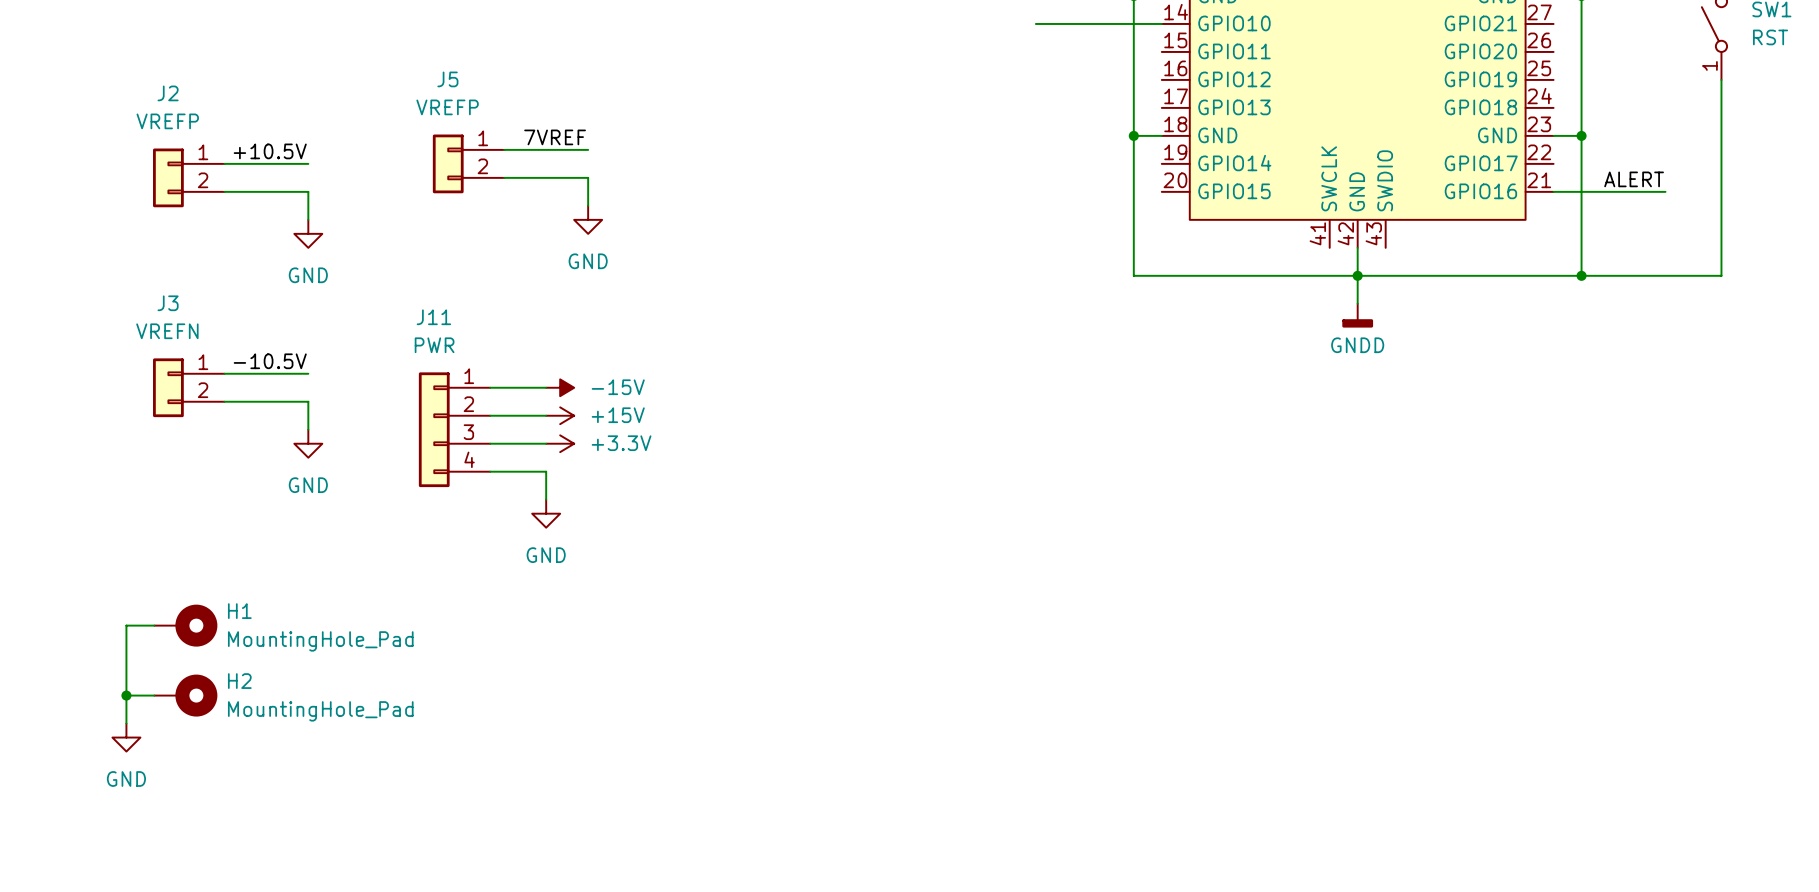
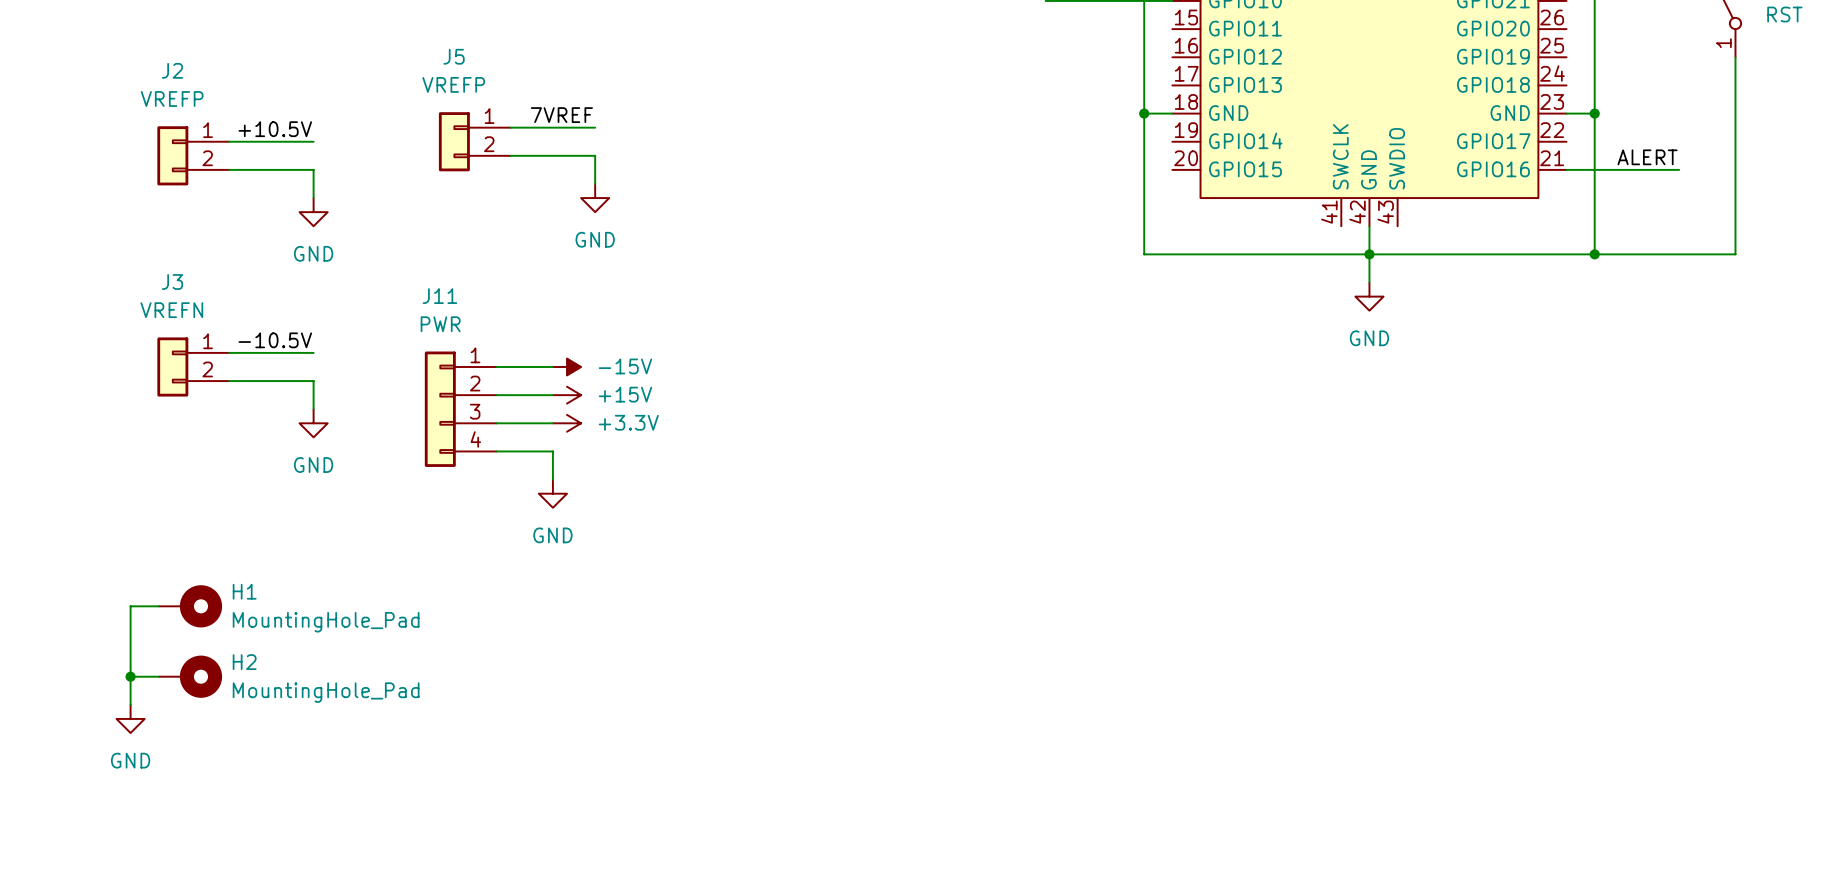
power symbol: GNDD (1357, 315) -> GND (1369, 296)

